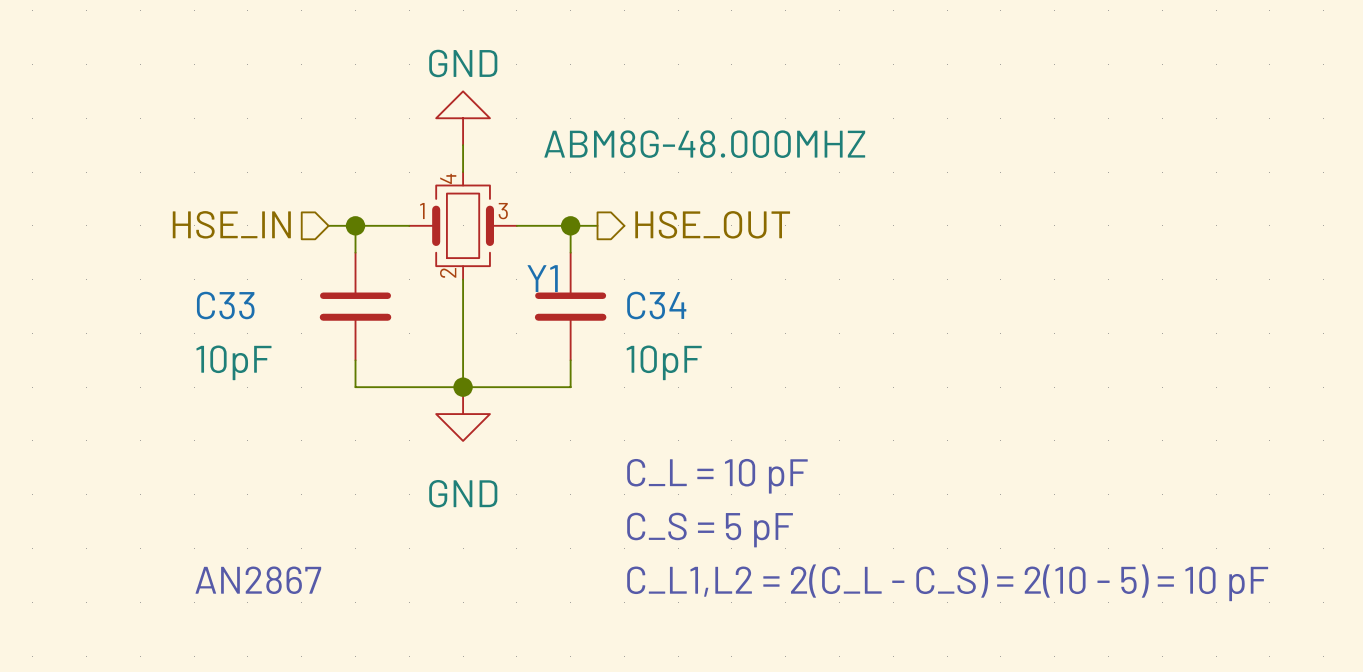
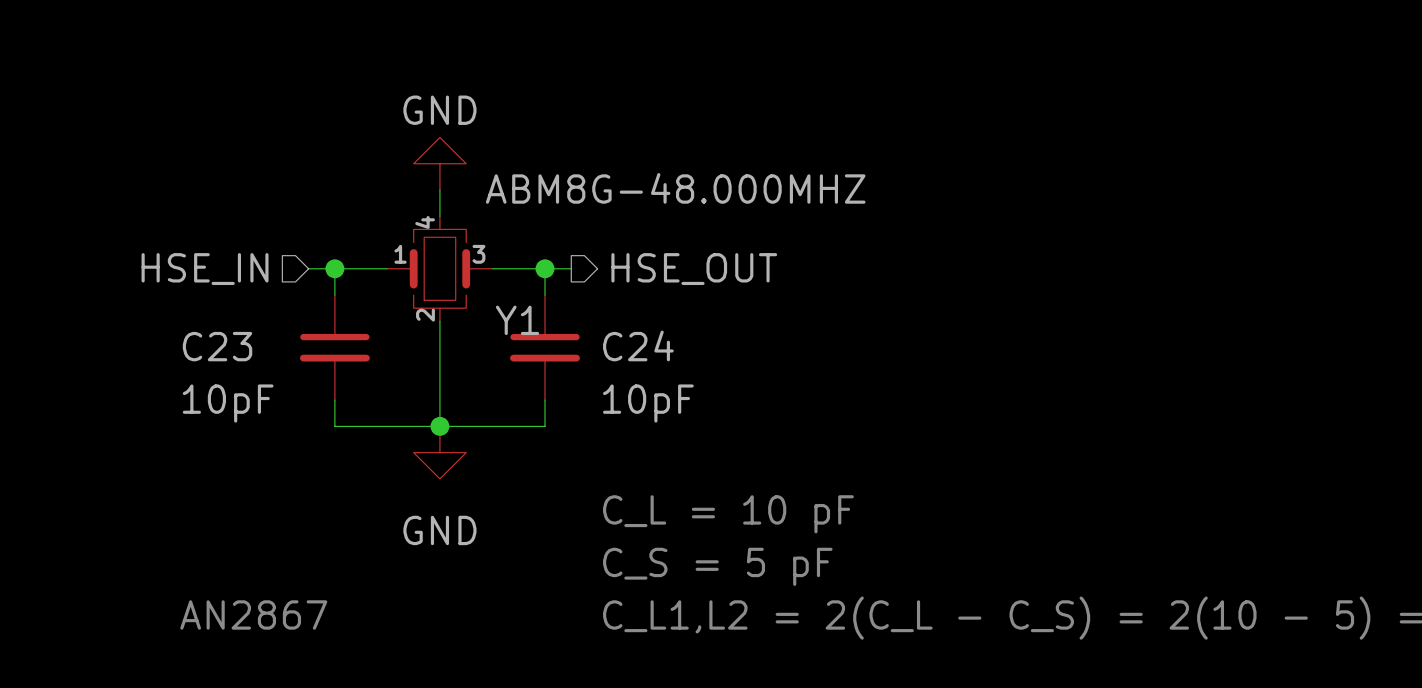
C33 name: C33 (225, 305) -> C23 (217, 346)
C34 name: C34 (656, 305) -> C24 (638, 345)

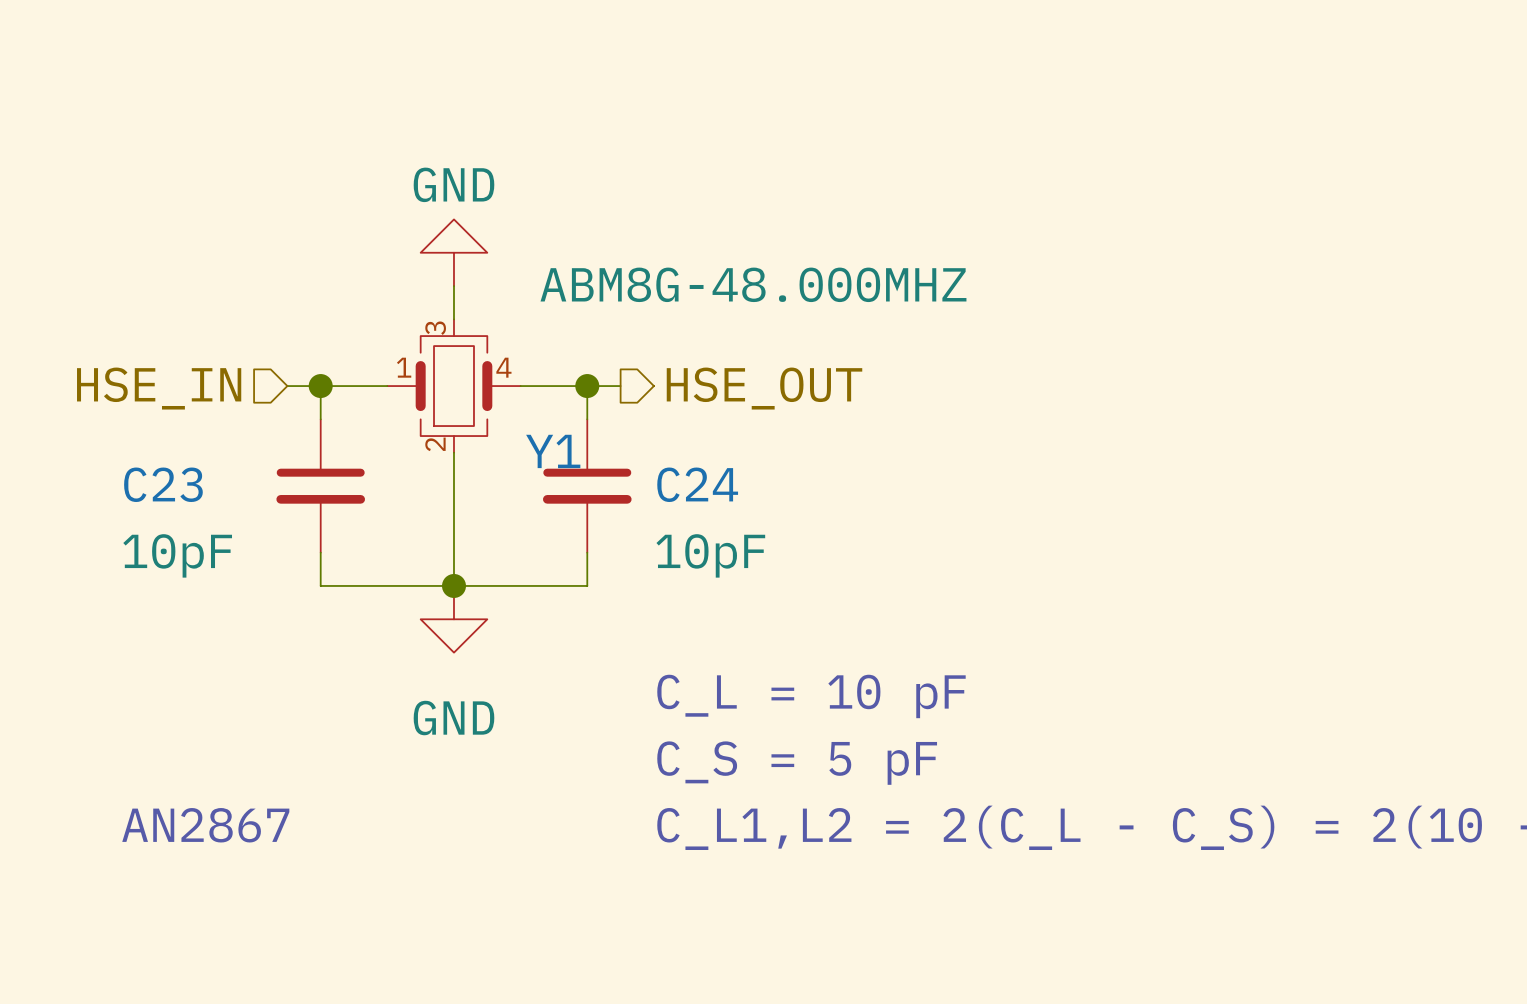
Y1 pin number: 4 (425, 222) -> 3 (435, 328)
Y1 pin number: 3 (478, 254) -> 4 (503, 367)

